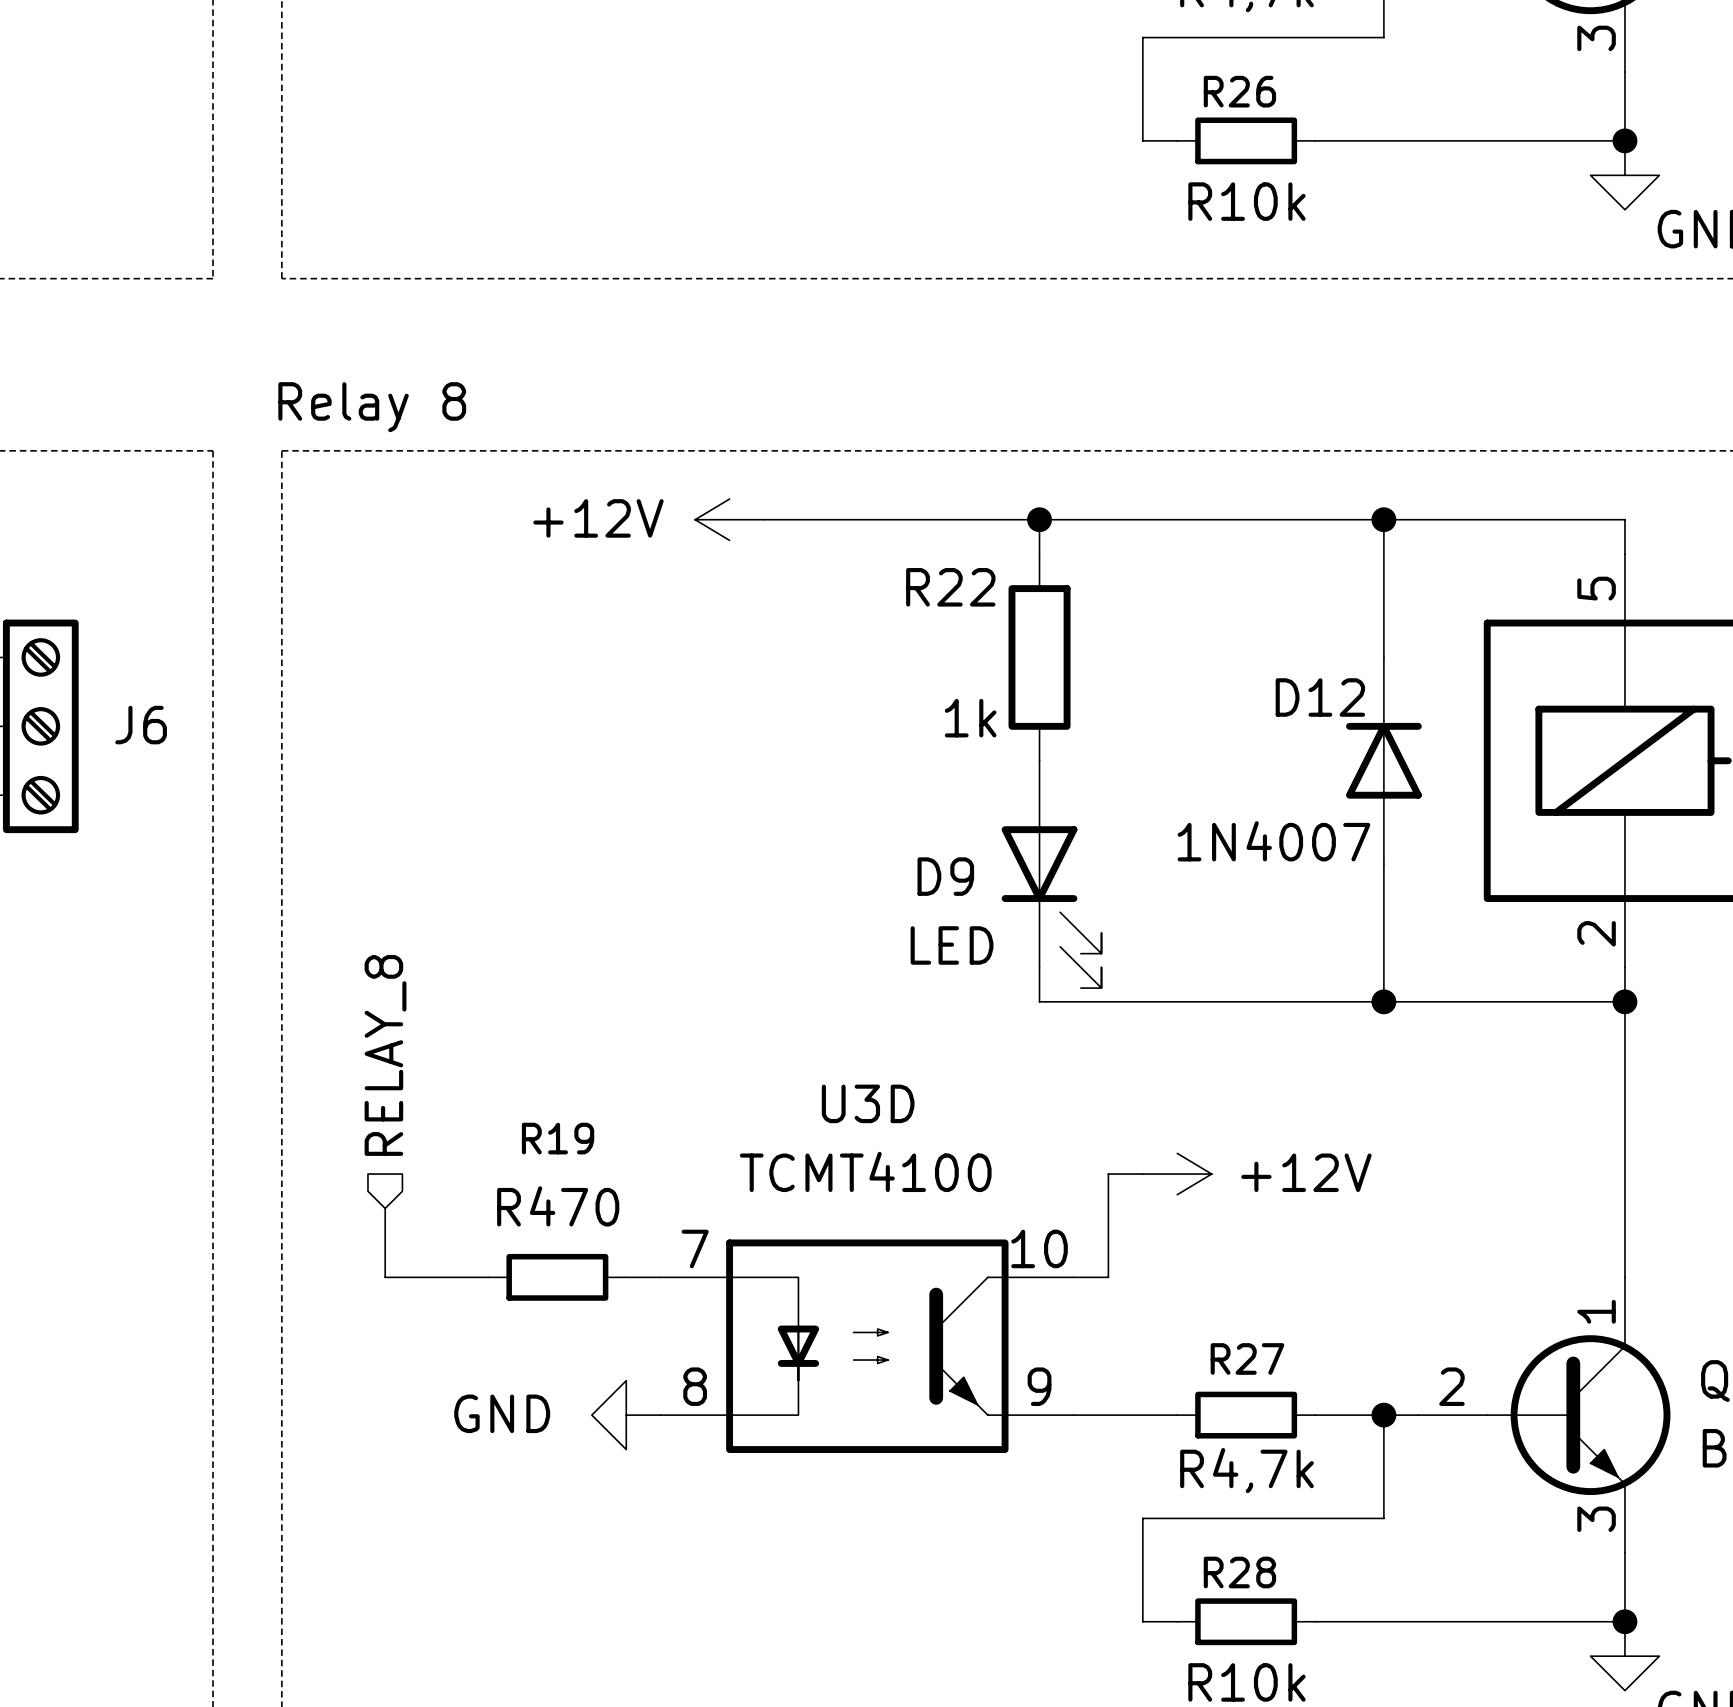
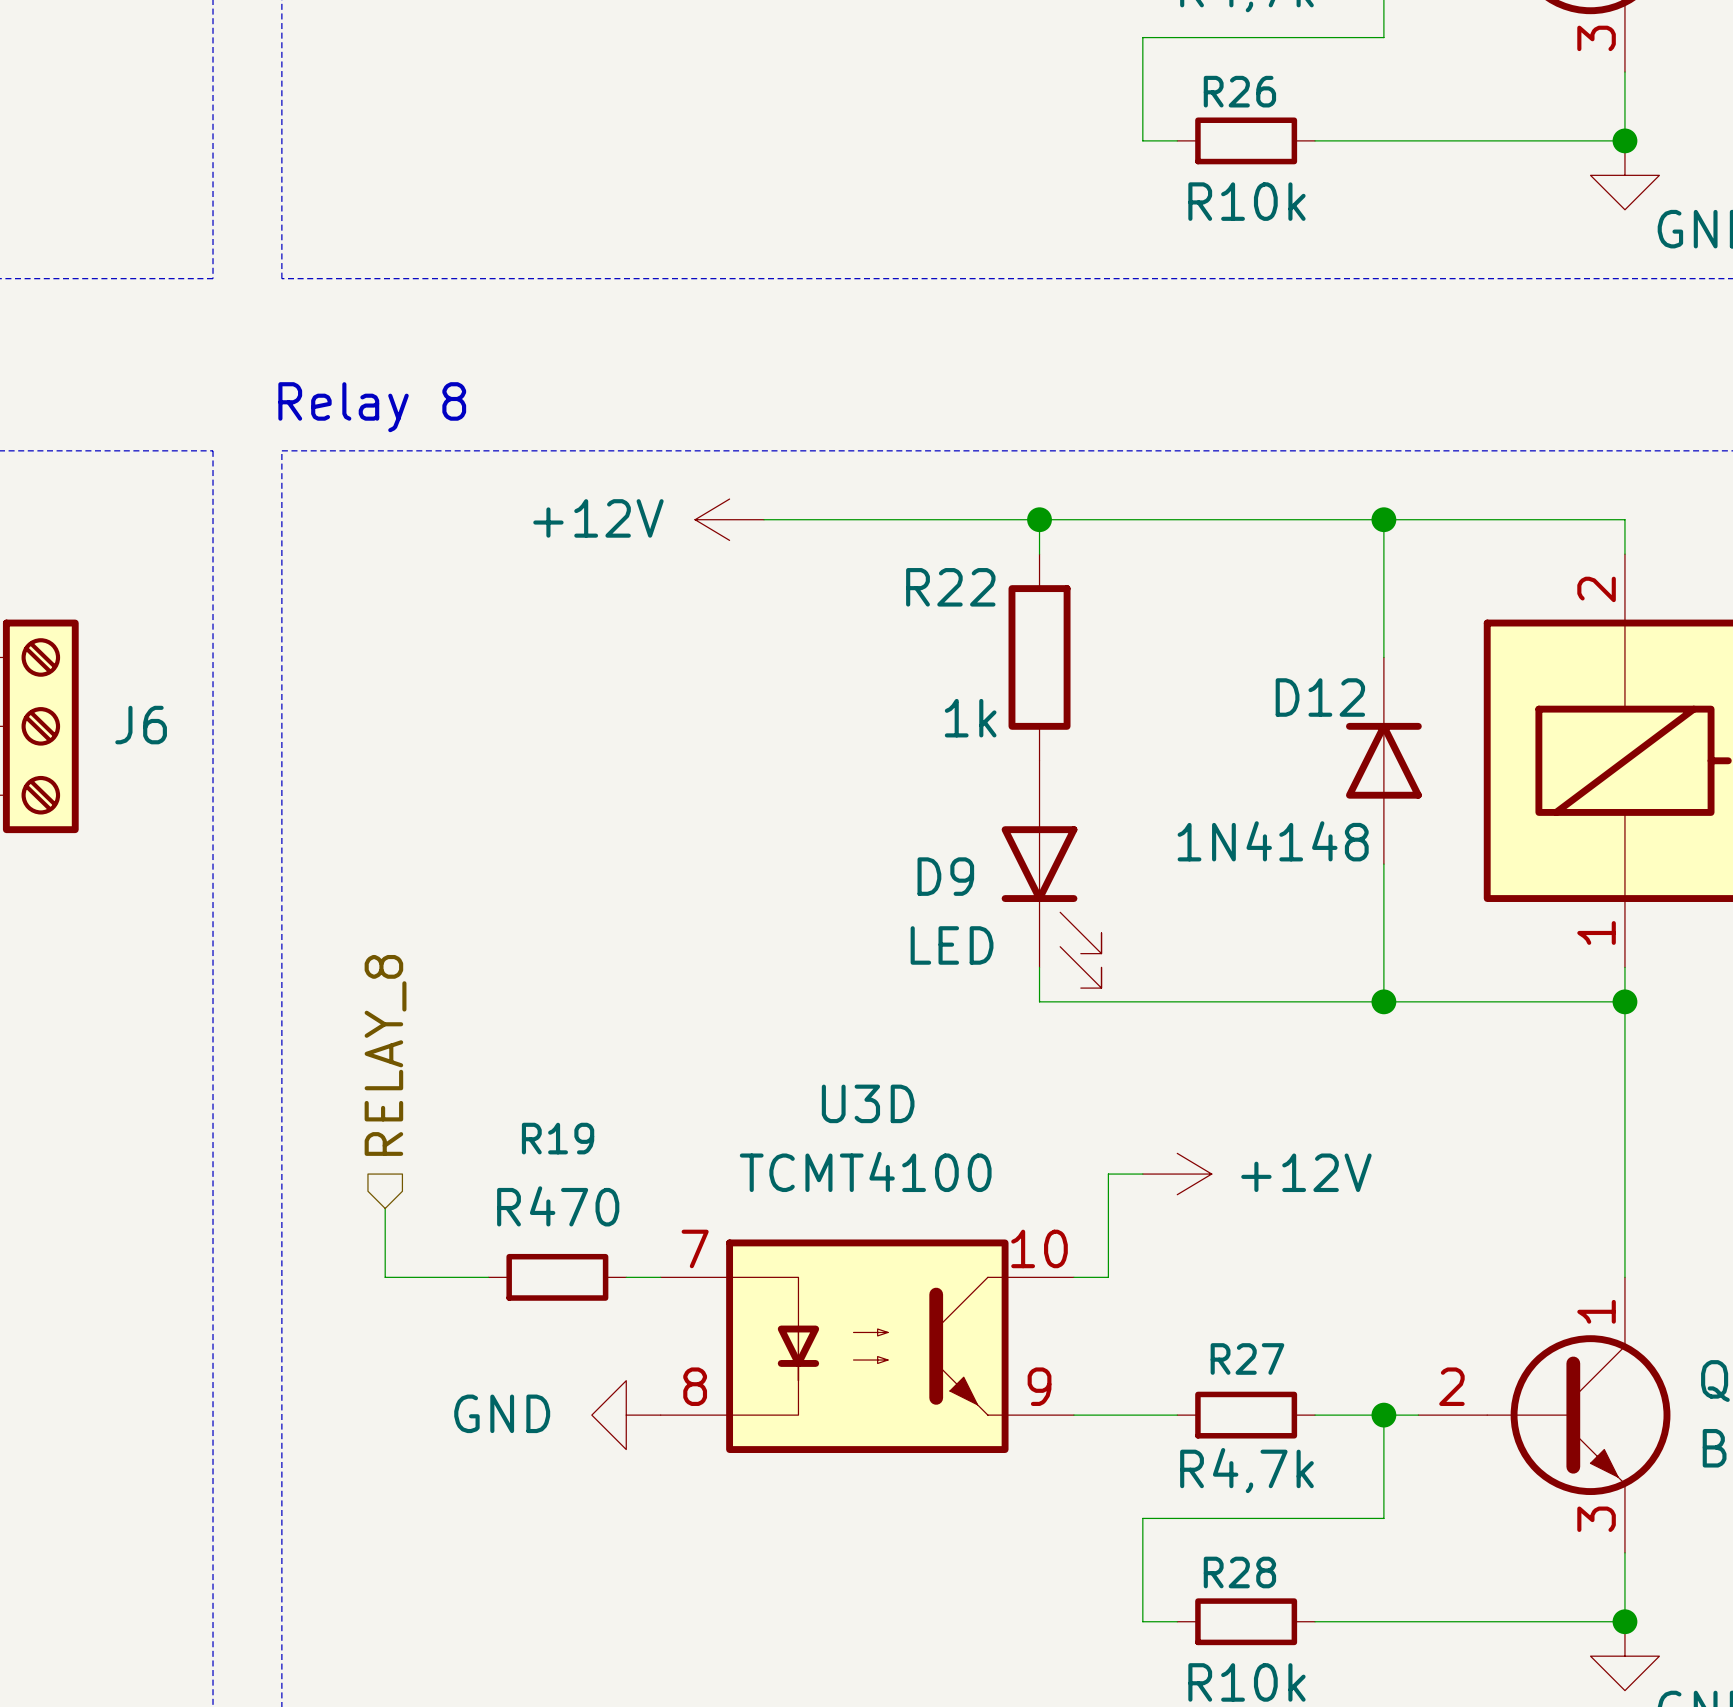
part pin number: 5 (1596, 588) -> 2 (1596, 589)
D12 value: 1N4007 (1273, 841) -> 1N4148 (1273, 841)
part pin number: 2 (1596, 933) -> 1 (1596, 932)

